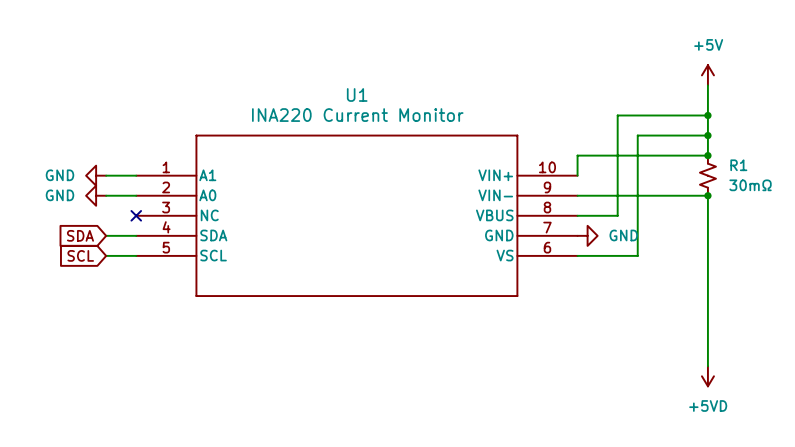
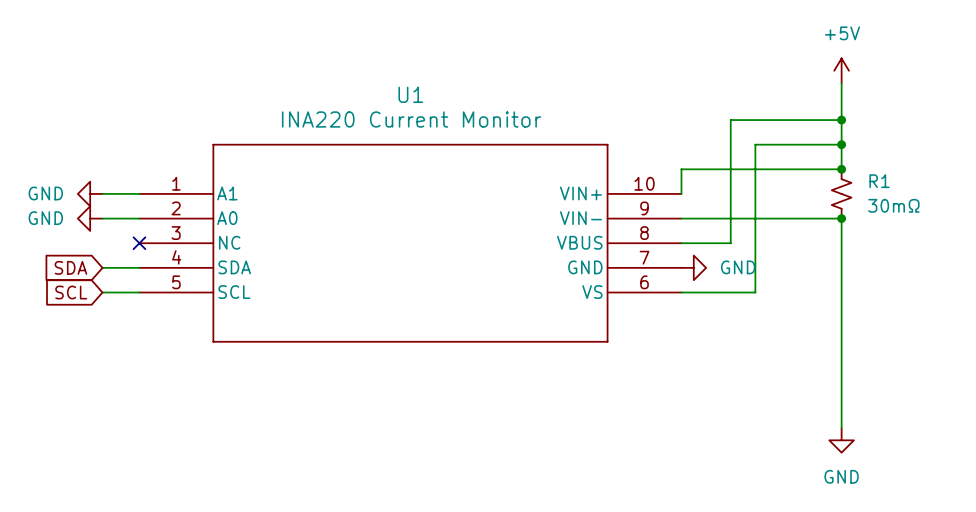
power symbol: +5VD (707, 376) -> GND (841, 440)

